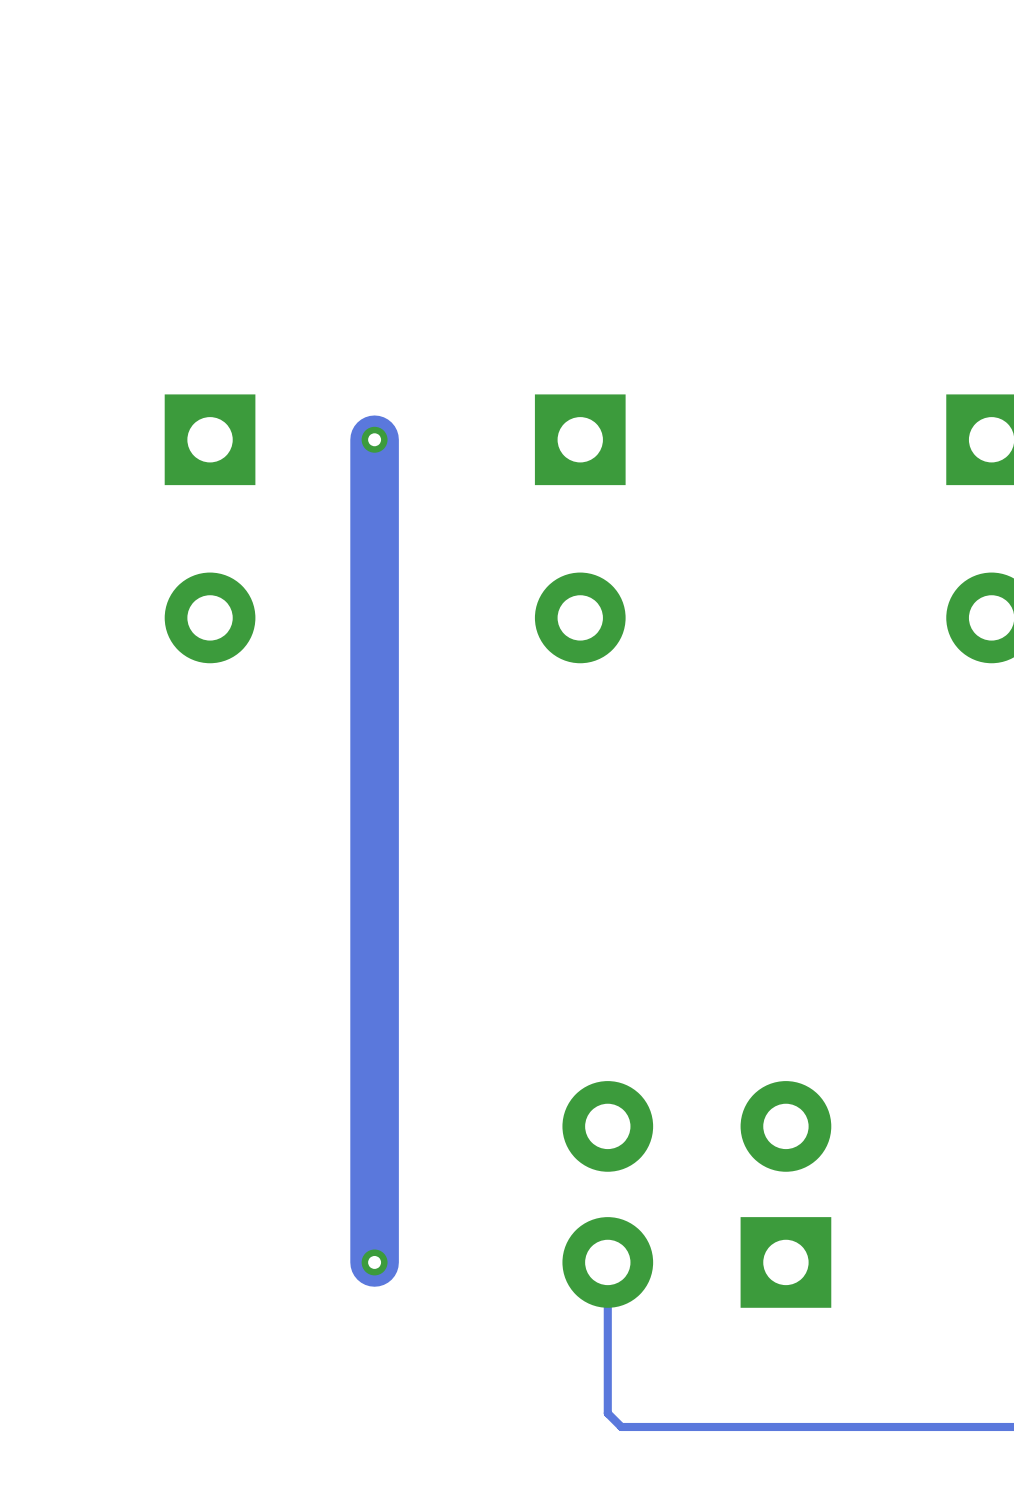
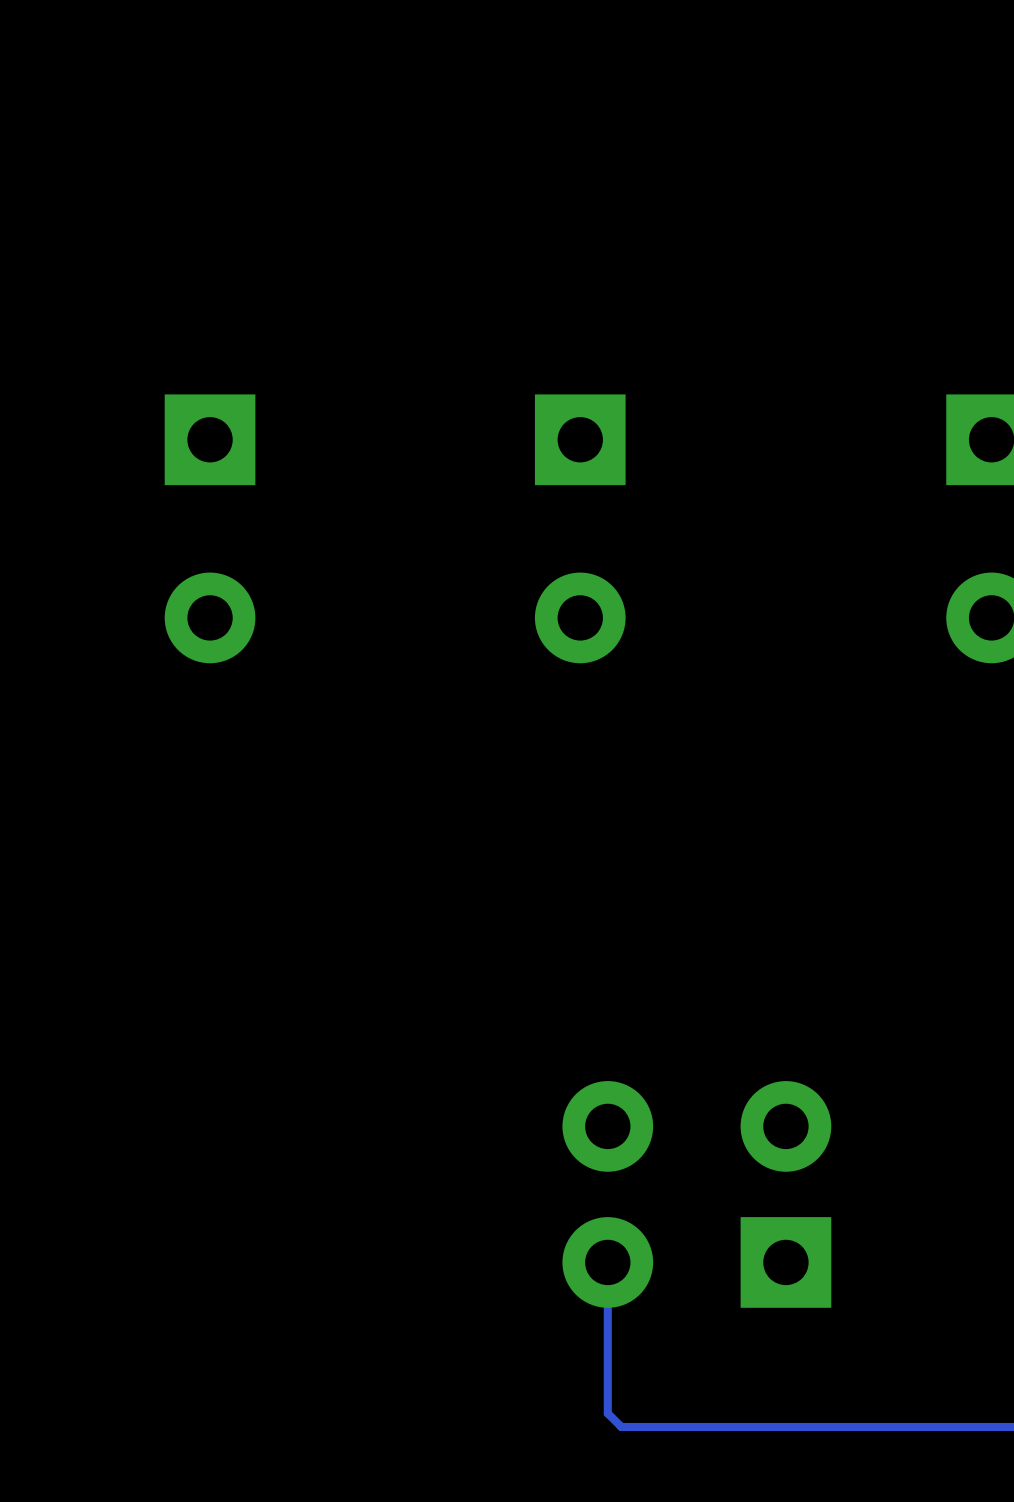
track: (374, 439) (374, 1262) -> none
via: (374, 439) -> none
via: (374, 1262) -> none

